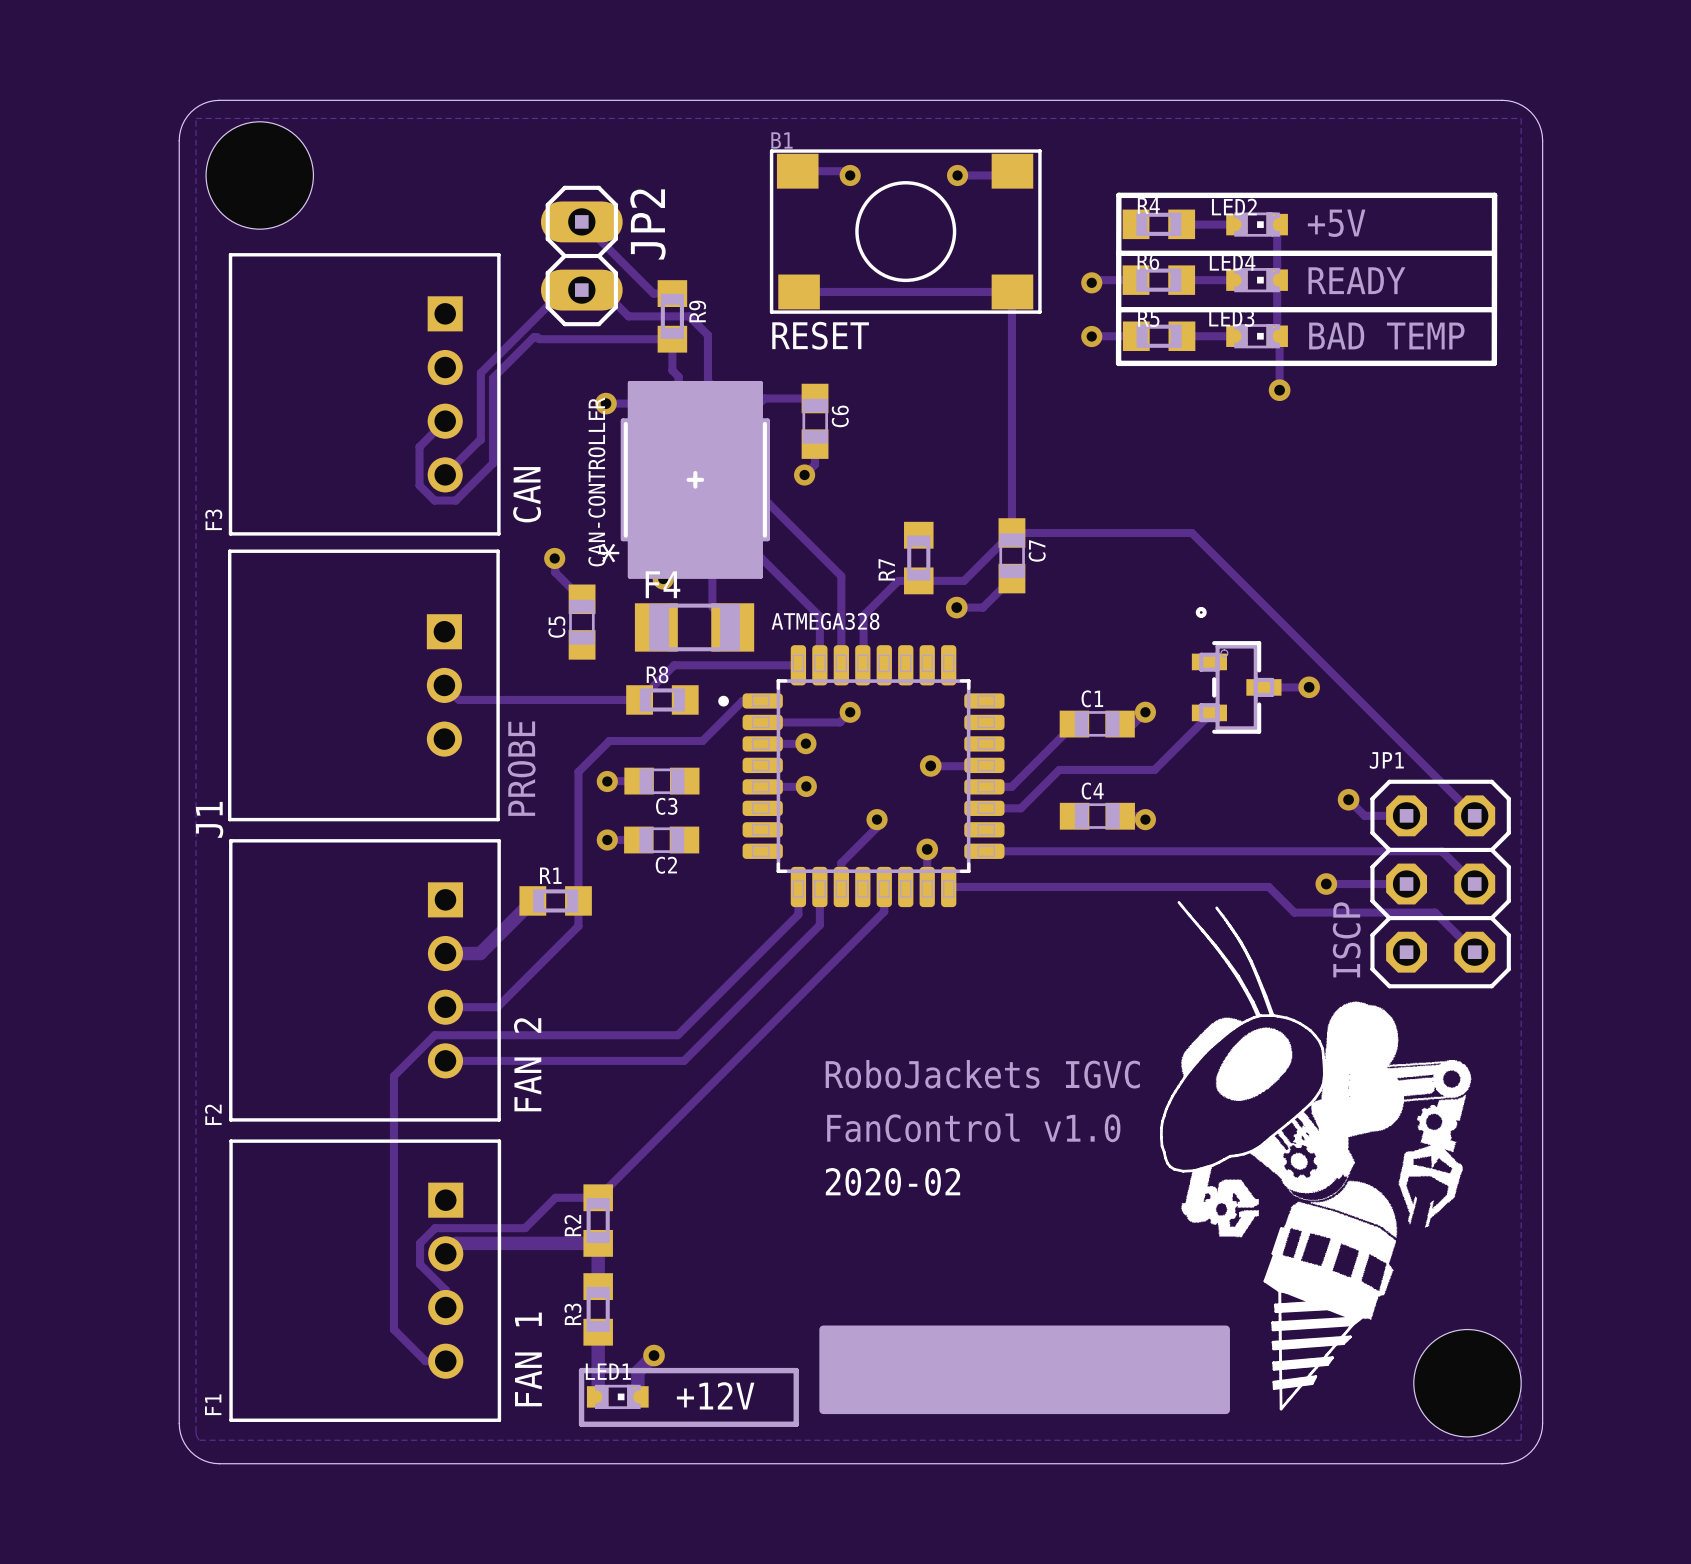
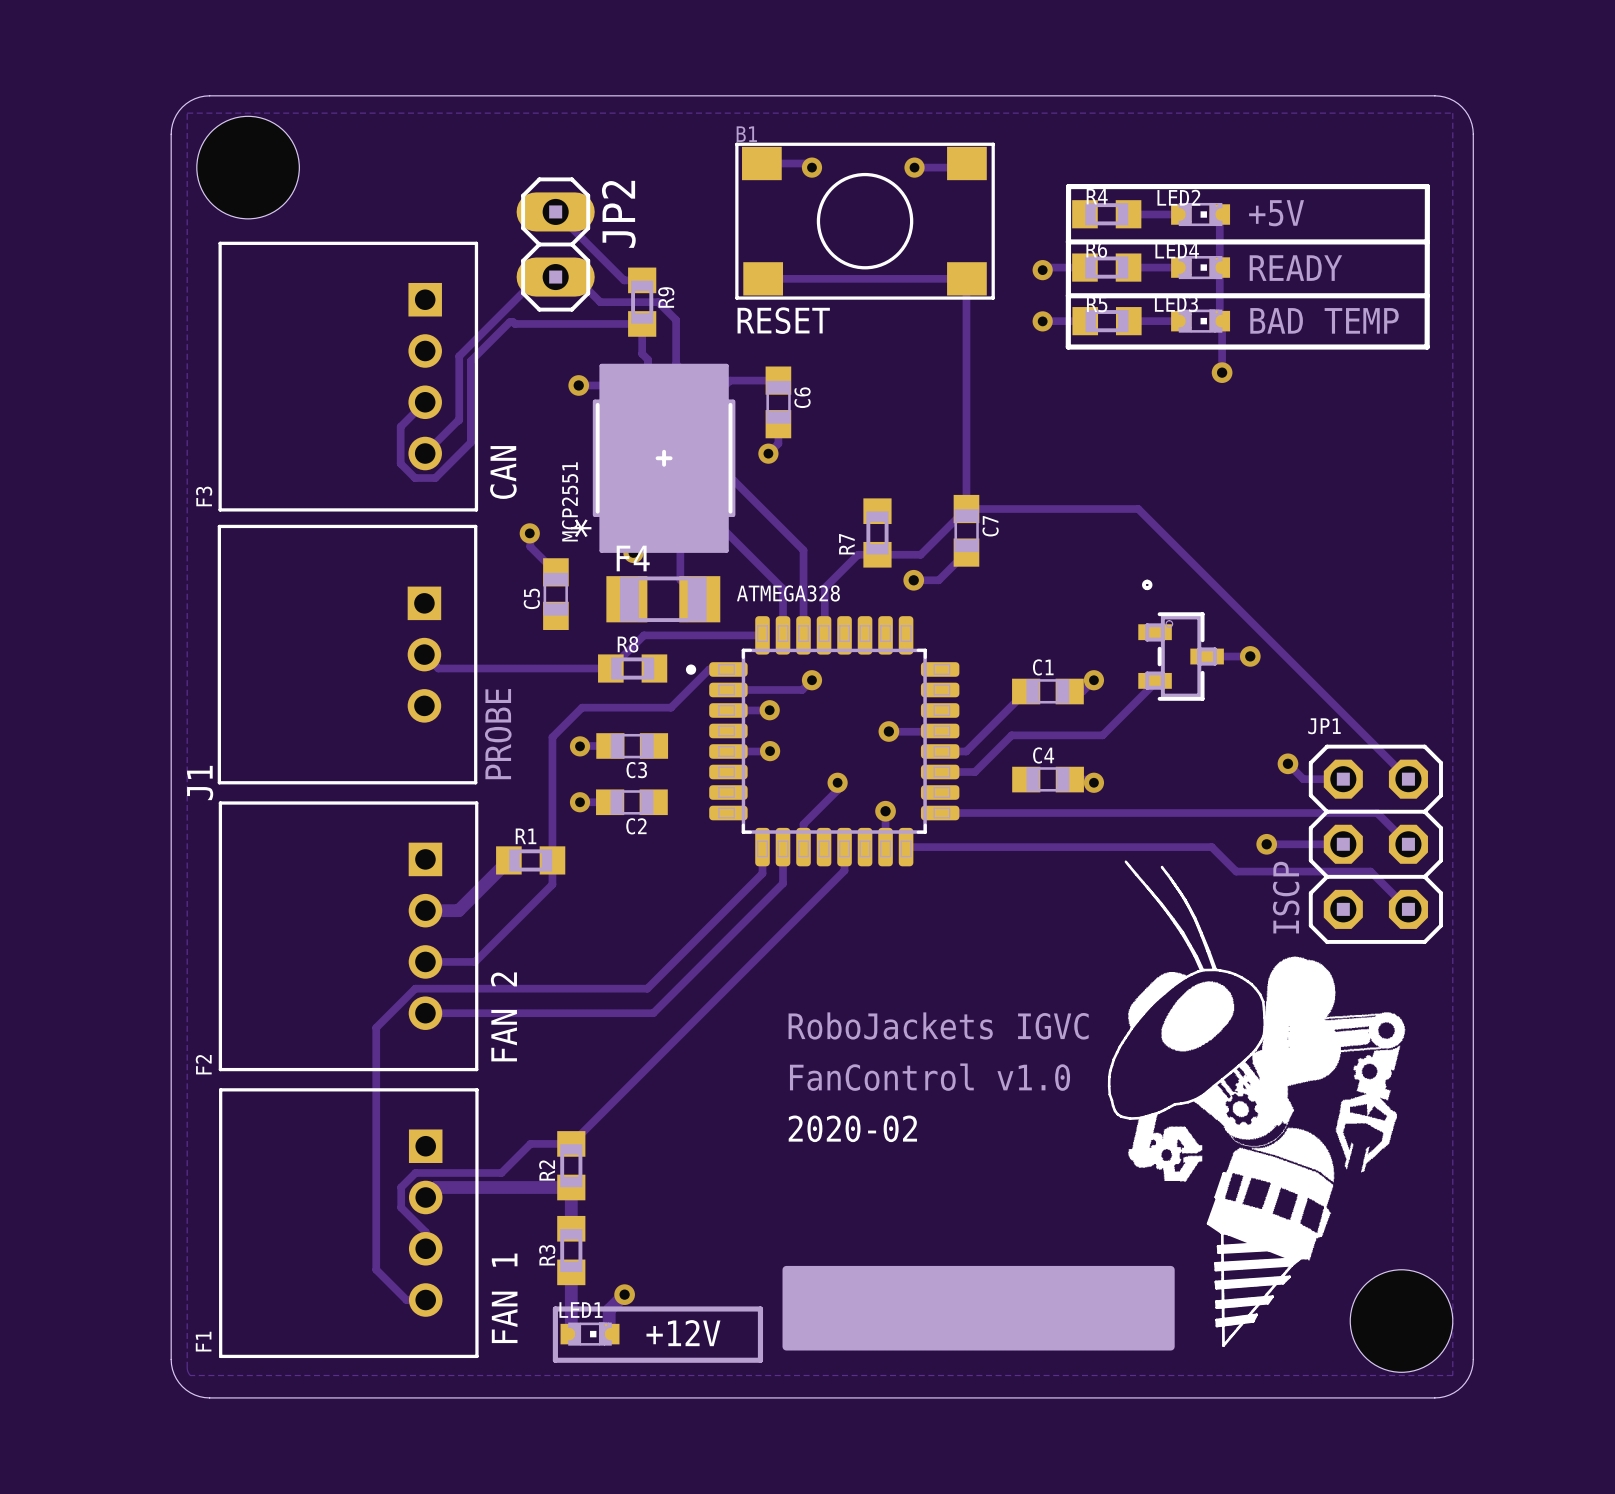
CAN-CONTROLLER name: CAN-CONTROLLER (596, 481) -> MCP2551 (570, 501)

